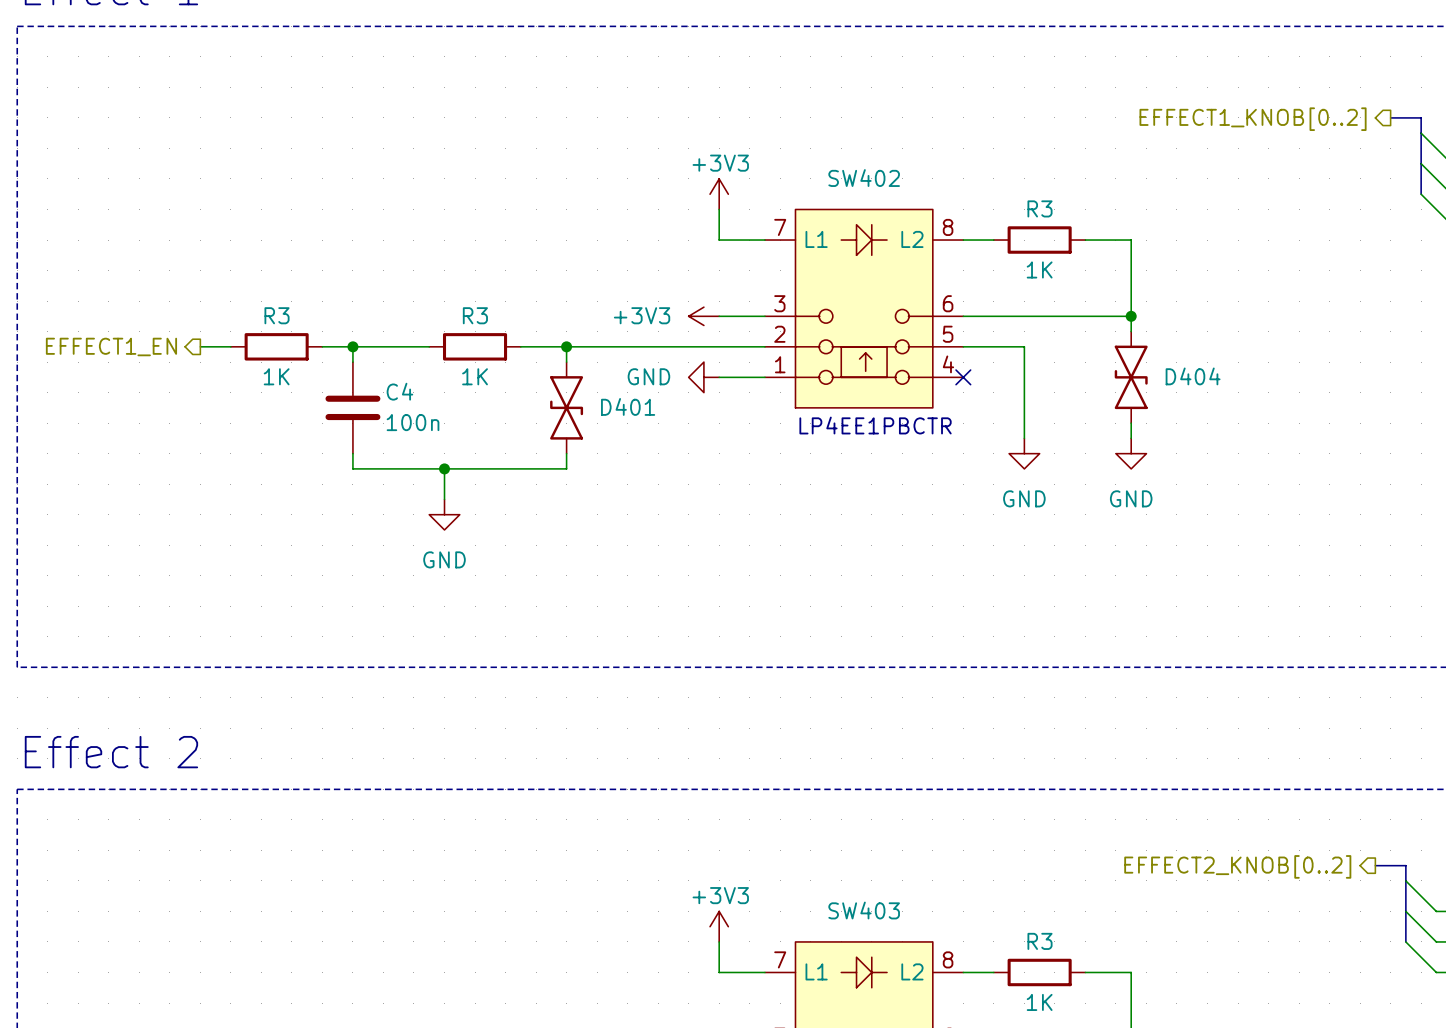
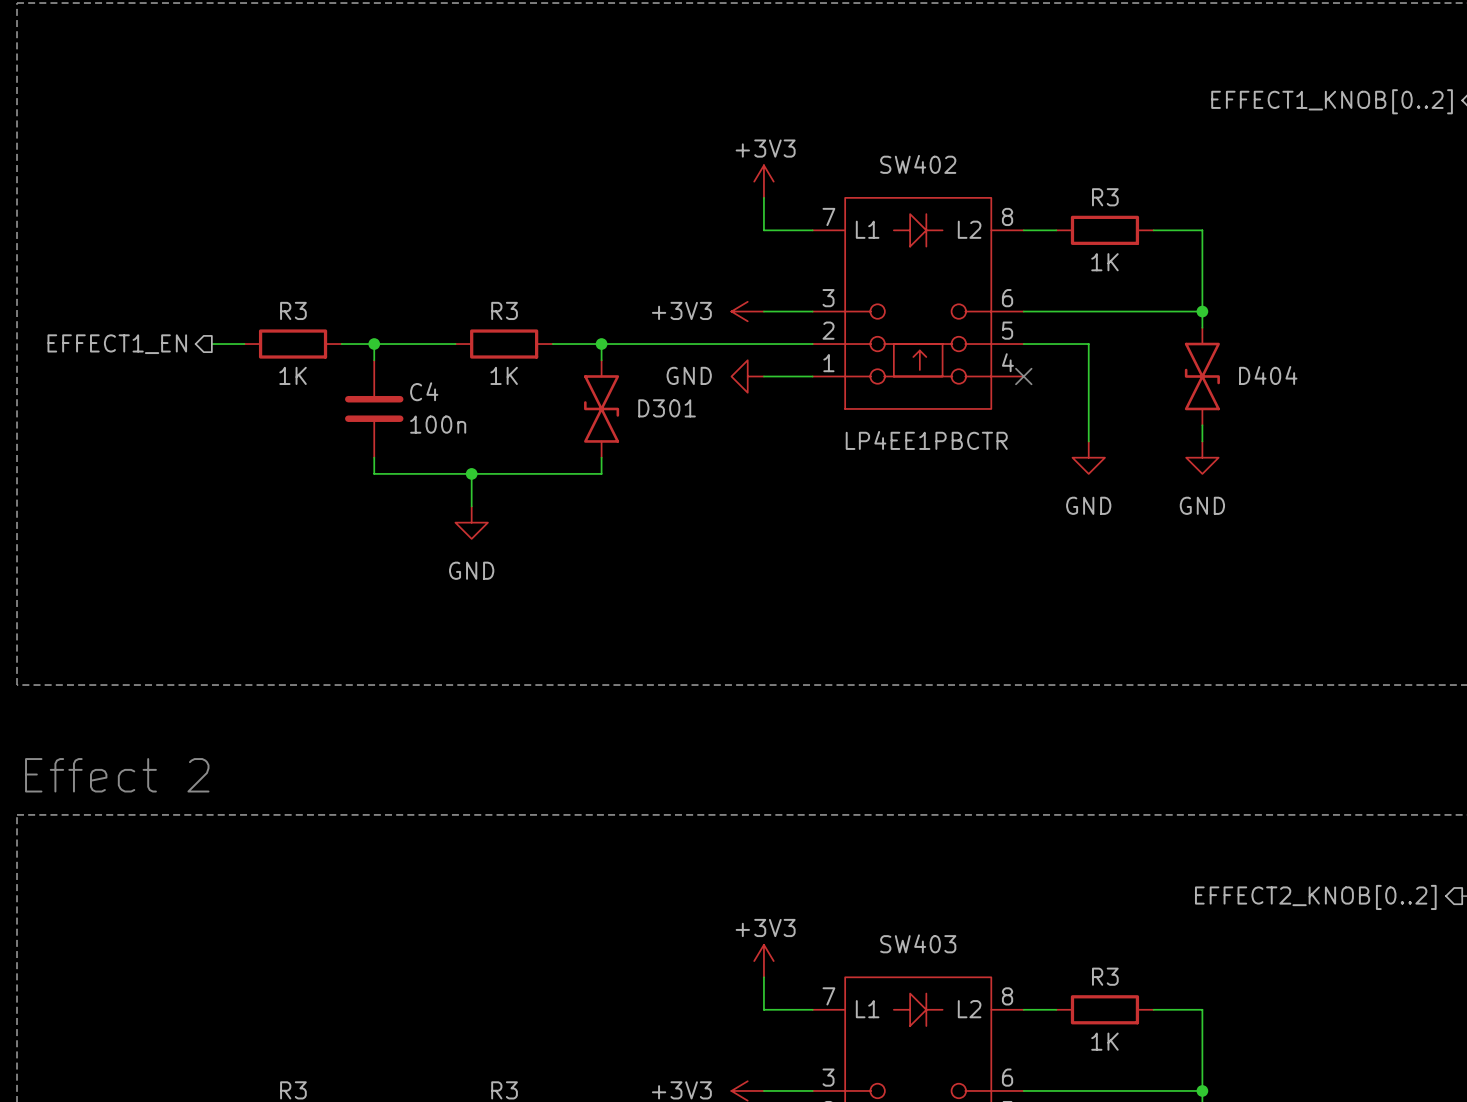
D401 name: D401 (628, 406) -> D301 (667, 408)
text: LP4EE1PBCTR (875, 425) -> none
SW402 value: none -> LP4EE1PBCTR (926, 440)

